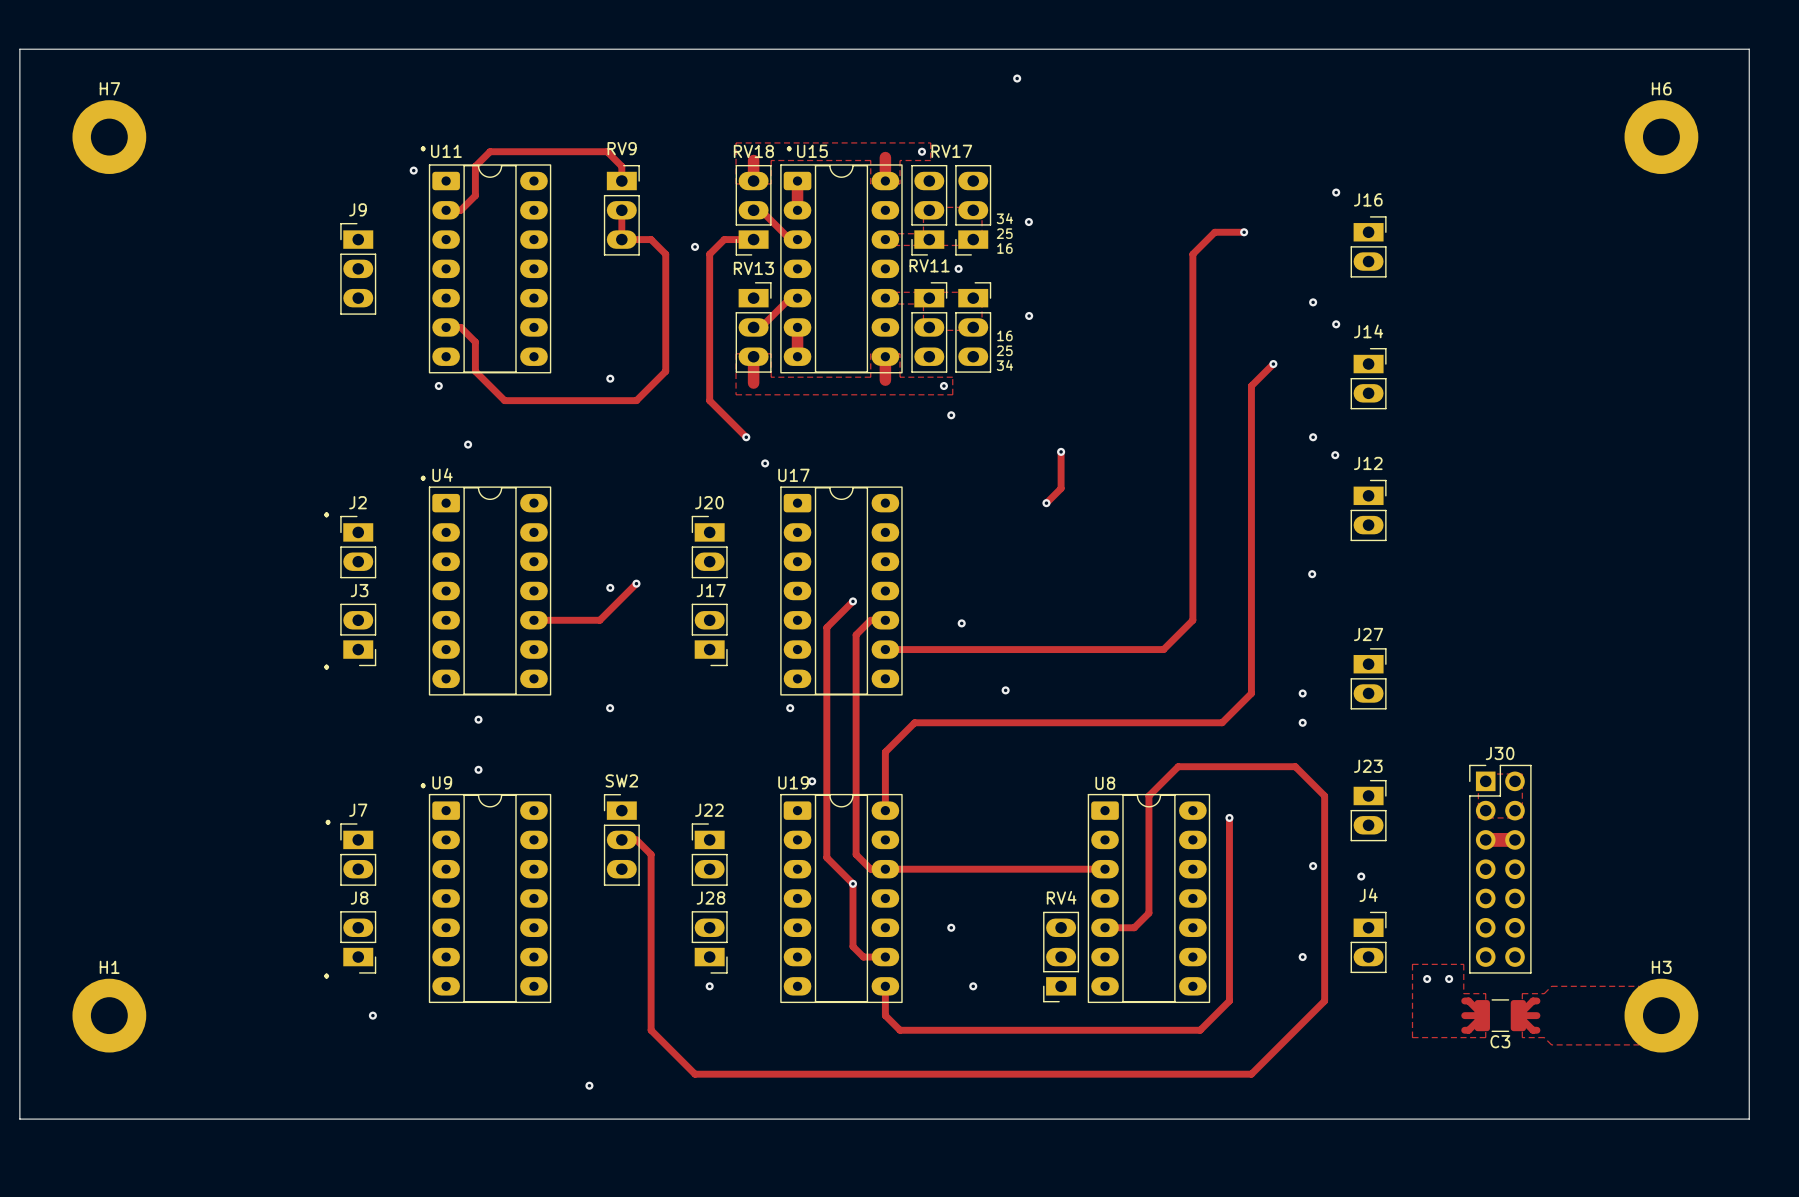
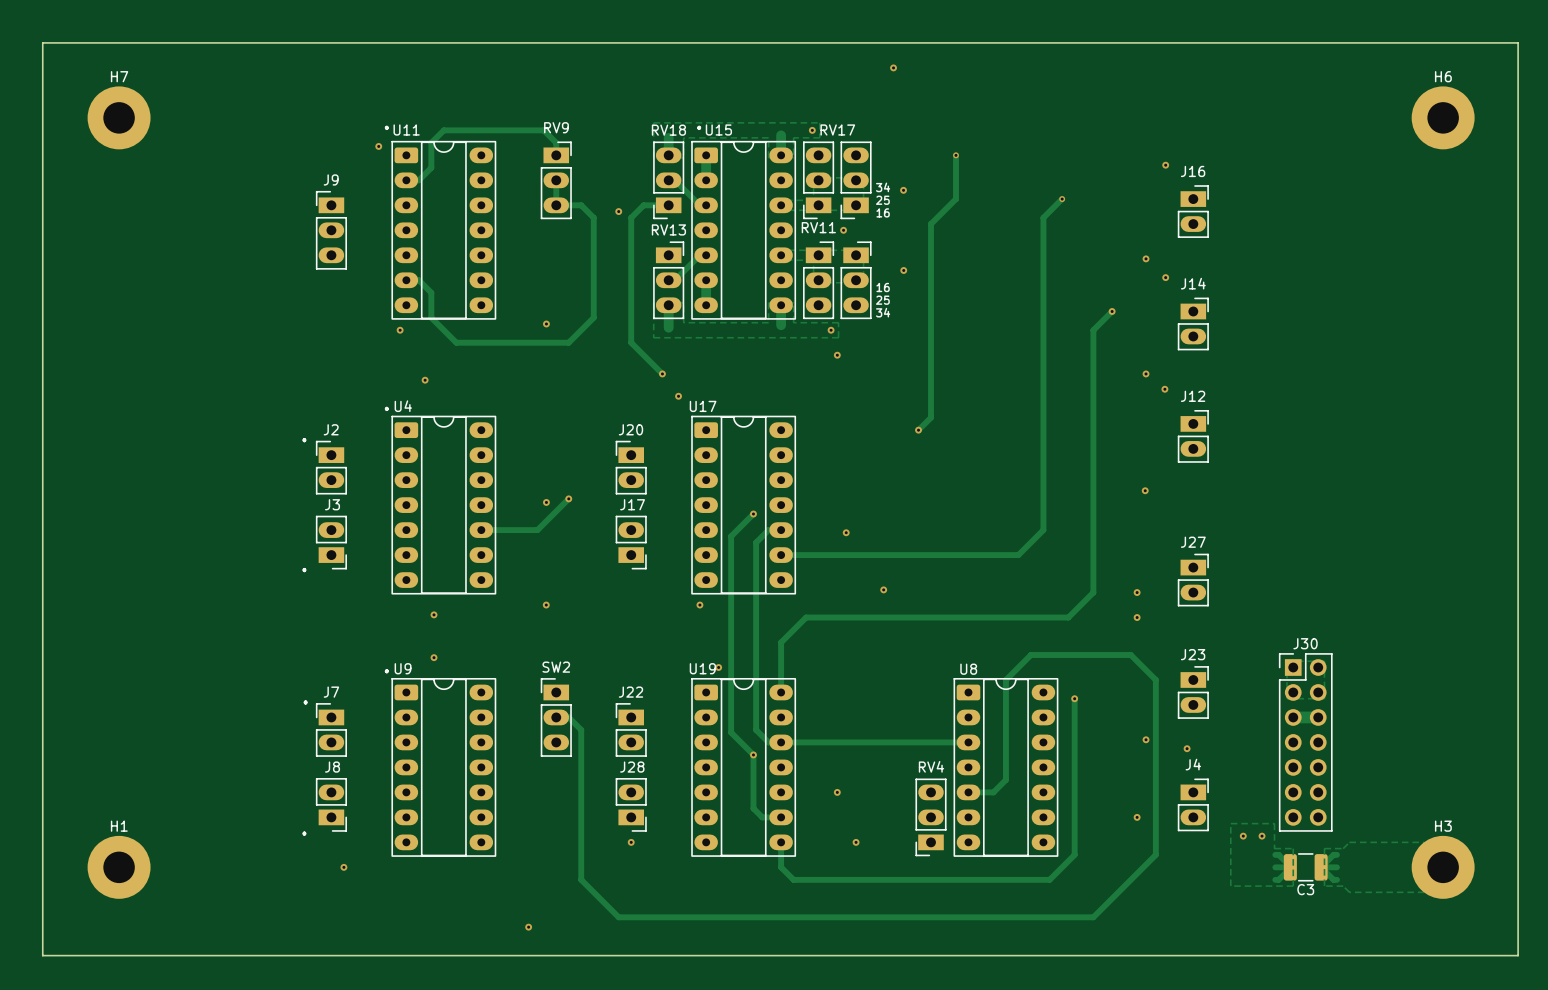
track: none -> (955, 155) (955, 199) (931, 224) (931, 386)
via: none -> (955, 155)
track: (1214, 232) (1244, 232) -> none
via: none -> (1062, 199)
via: (1244, 232) -> none
via: (1061, 451) -> none

